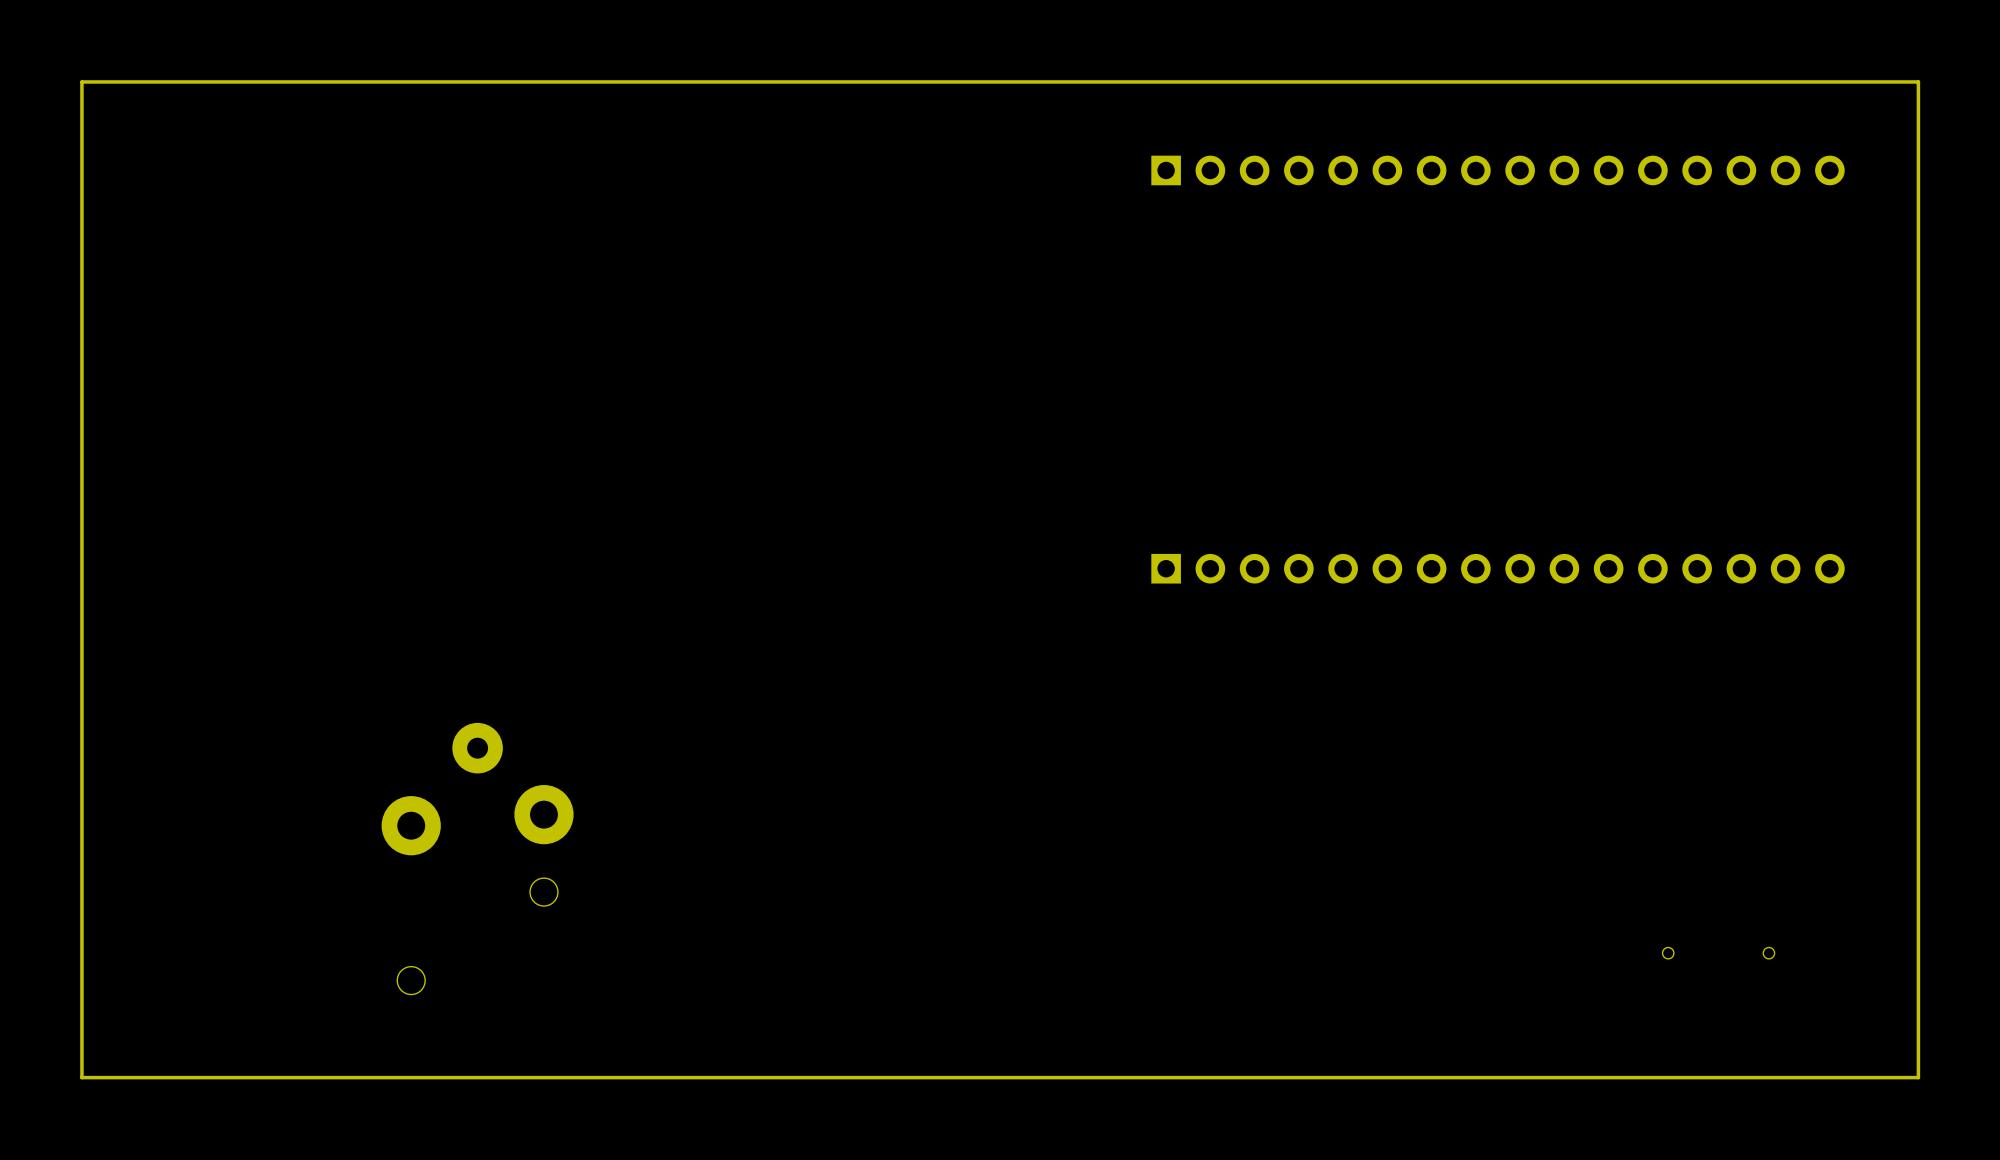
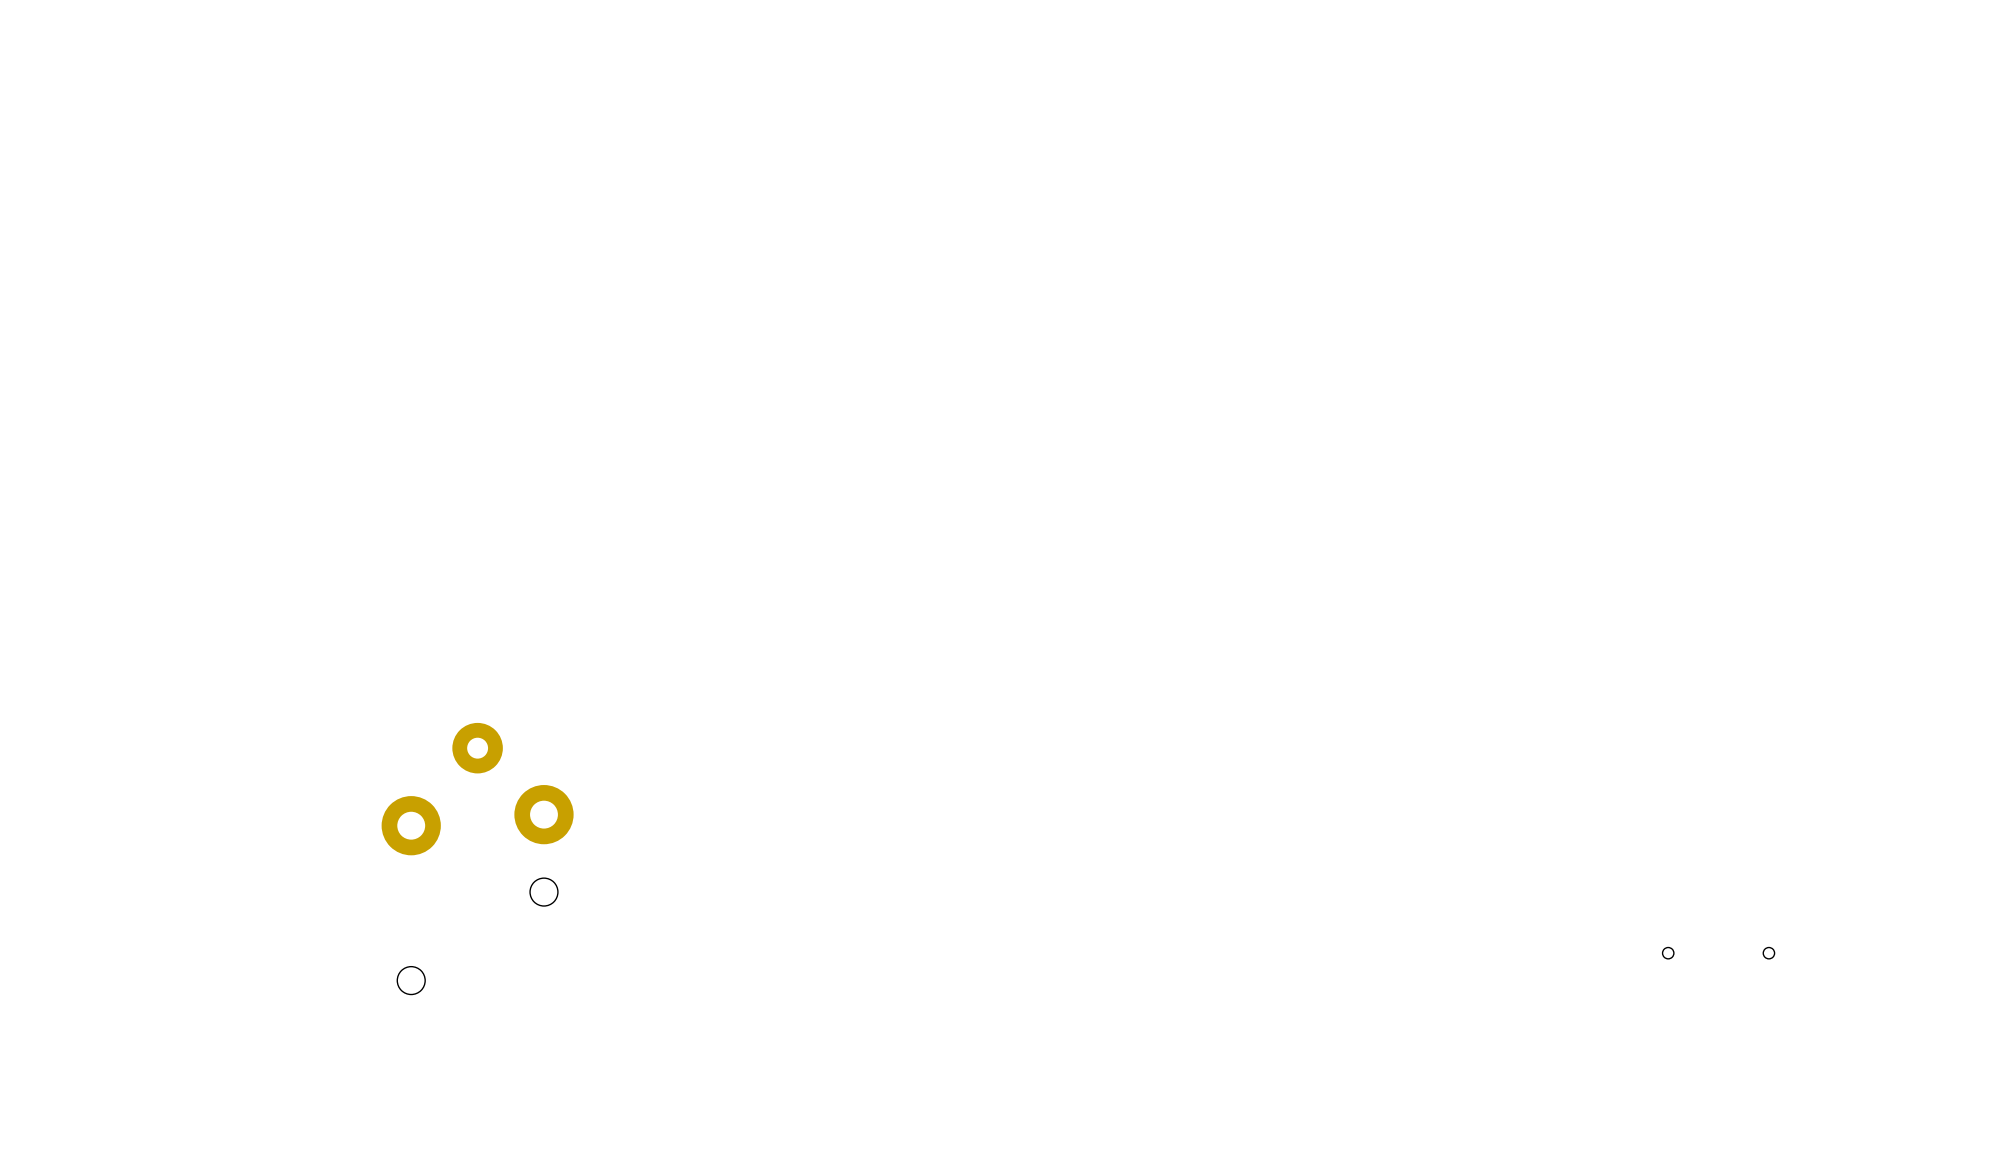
board edge: (1918, 81) (81, 81) (81, 1077) (1918, 1077) (1918, 81) -> none
part: (1498, 170) -> none
part: (1498, 568) -> none

